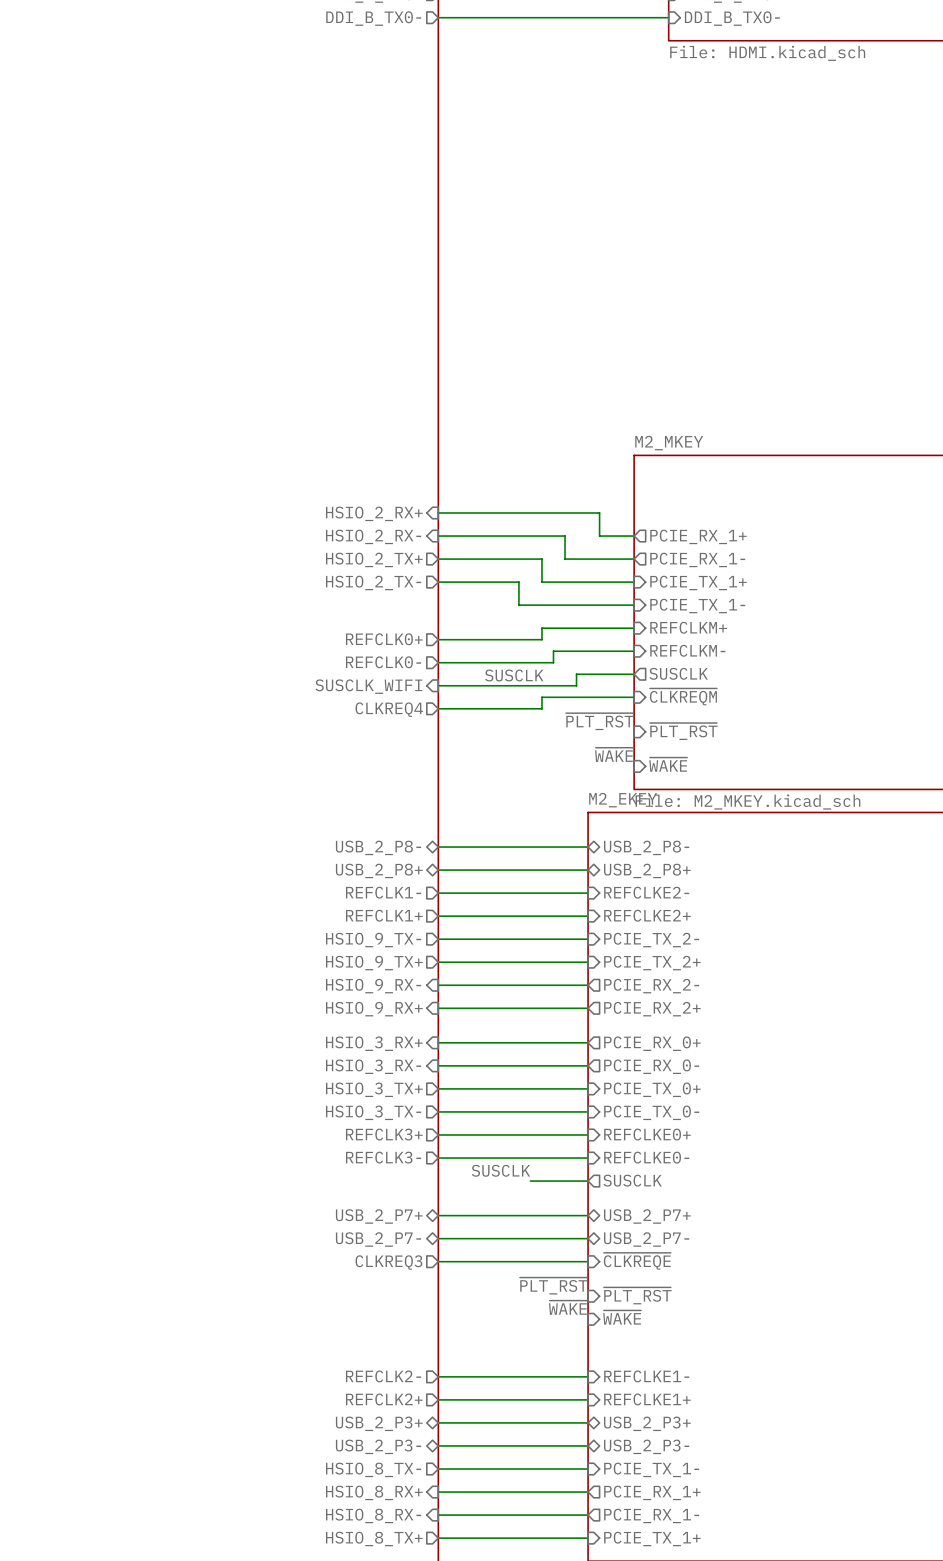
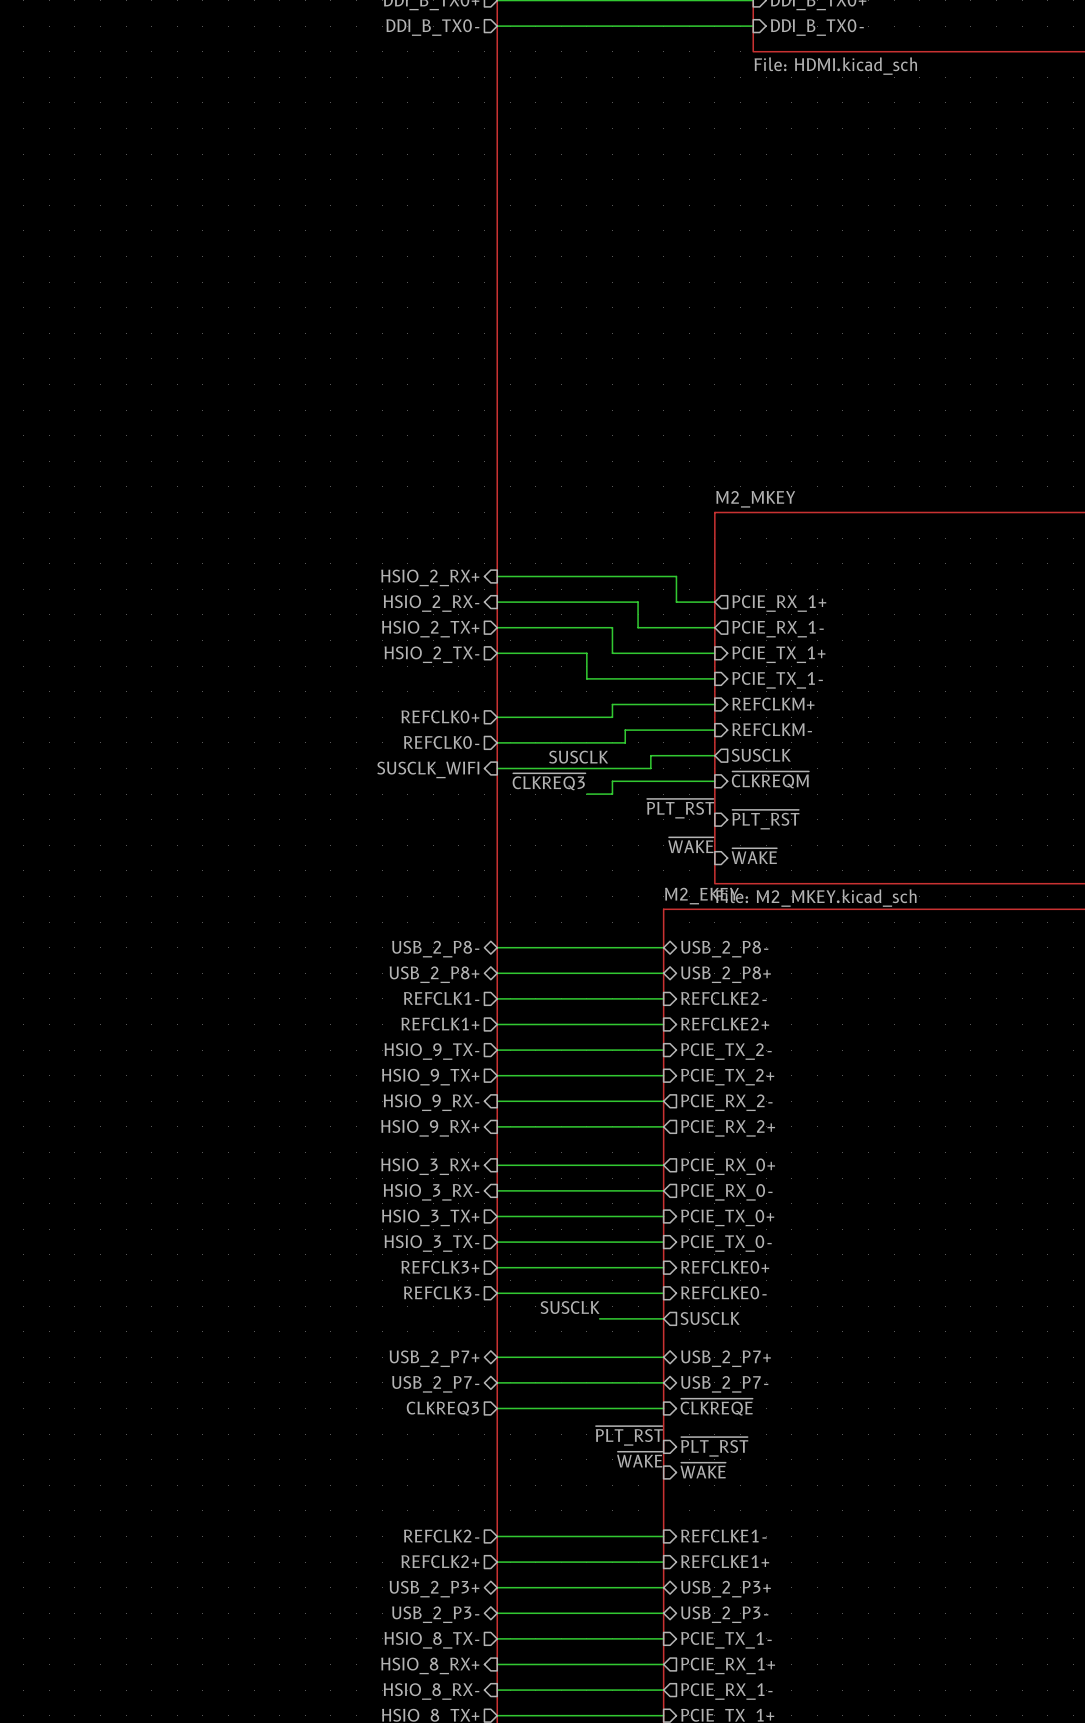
label: none -> ~{CLKREQ3} (549, 781)
wire: (438, 708) (518, 708) -> none
sheet pin: CLKREQ4 (389, 709) -> none

